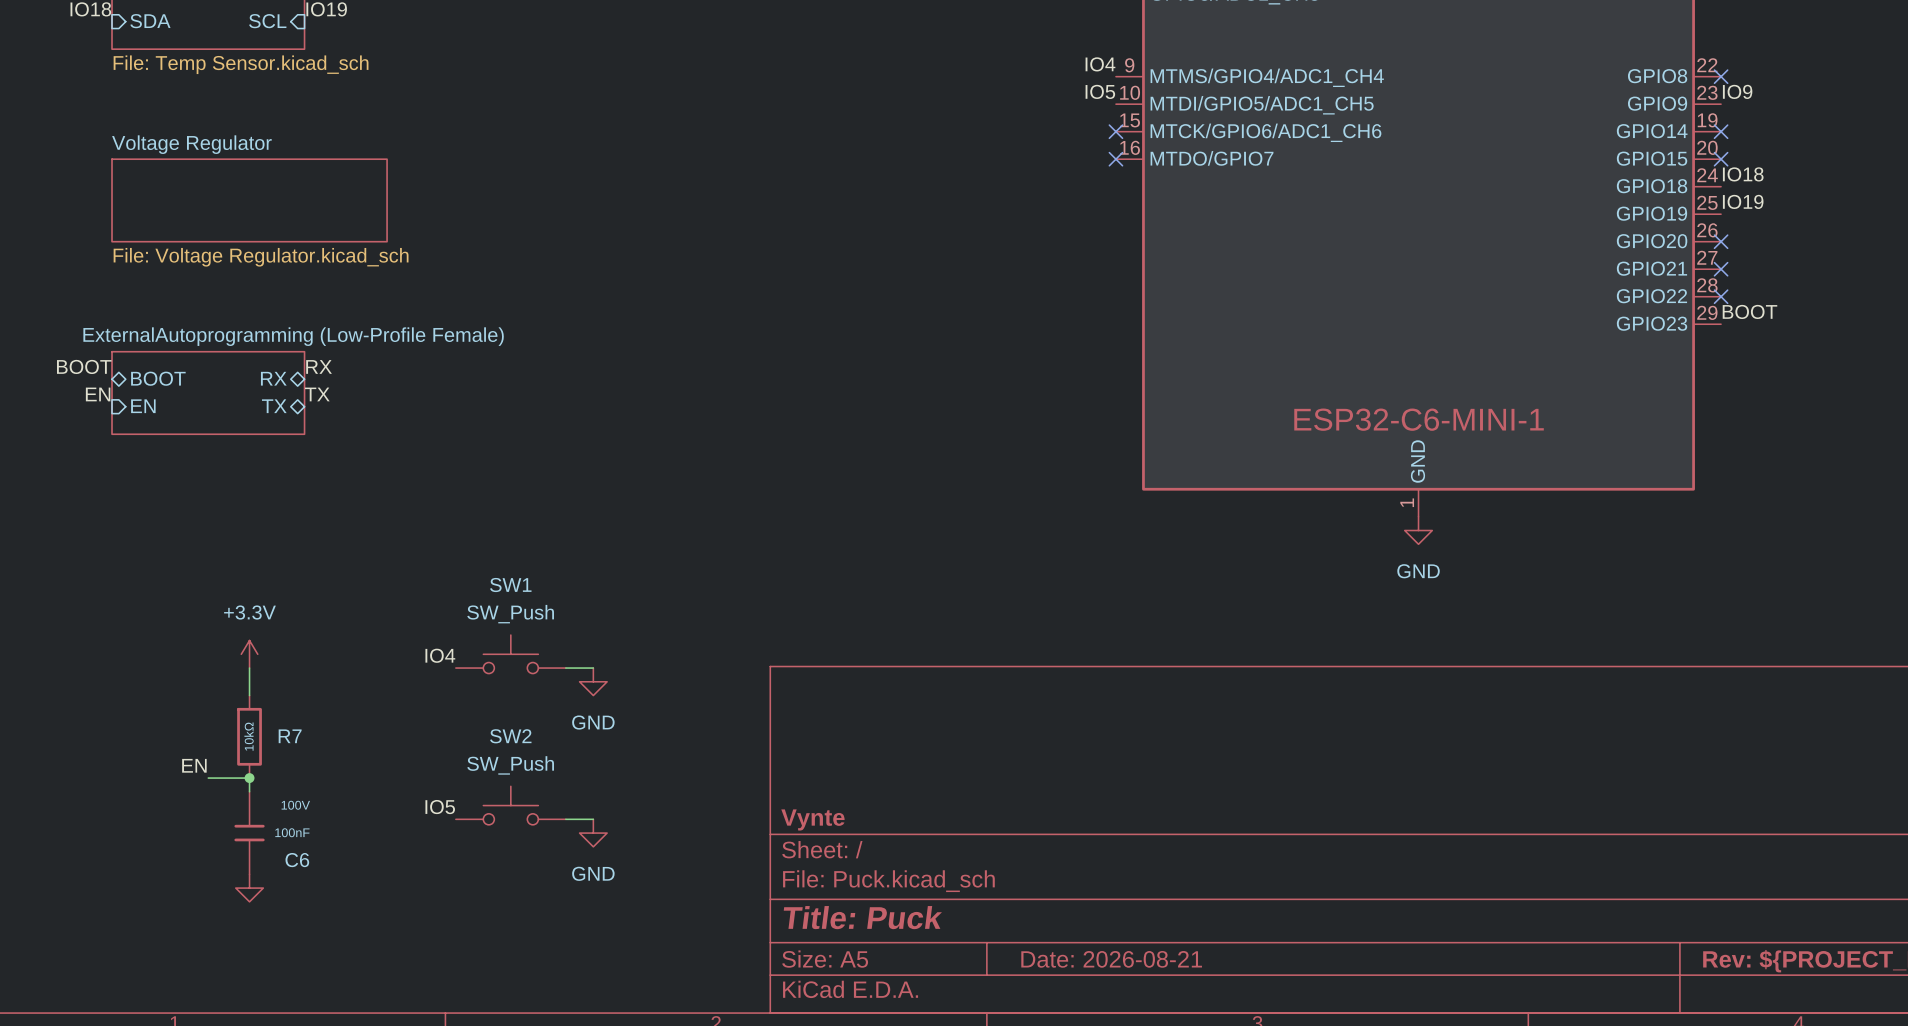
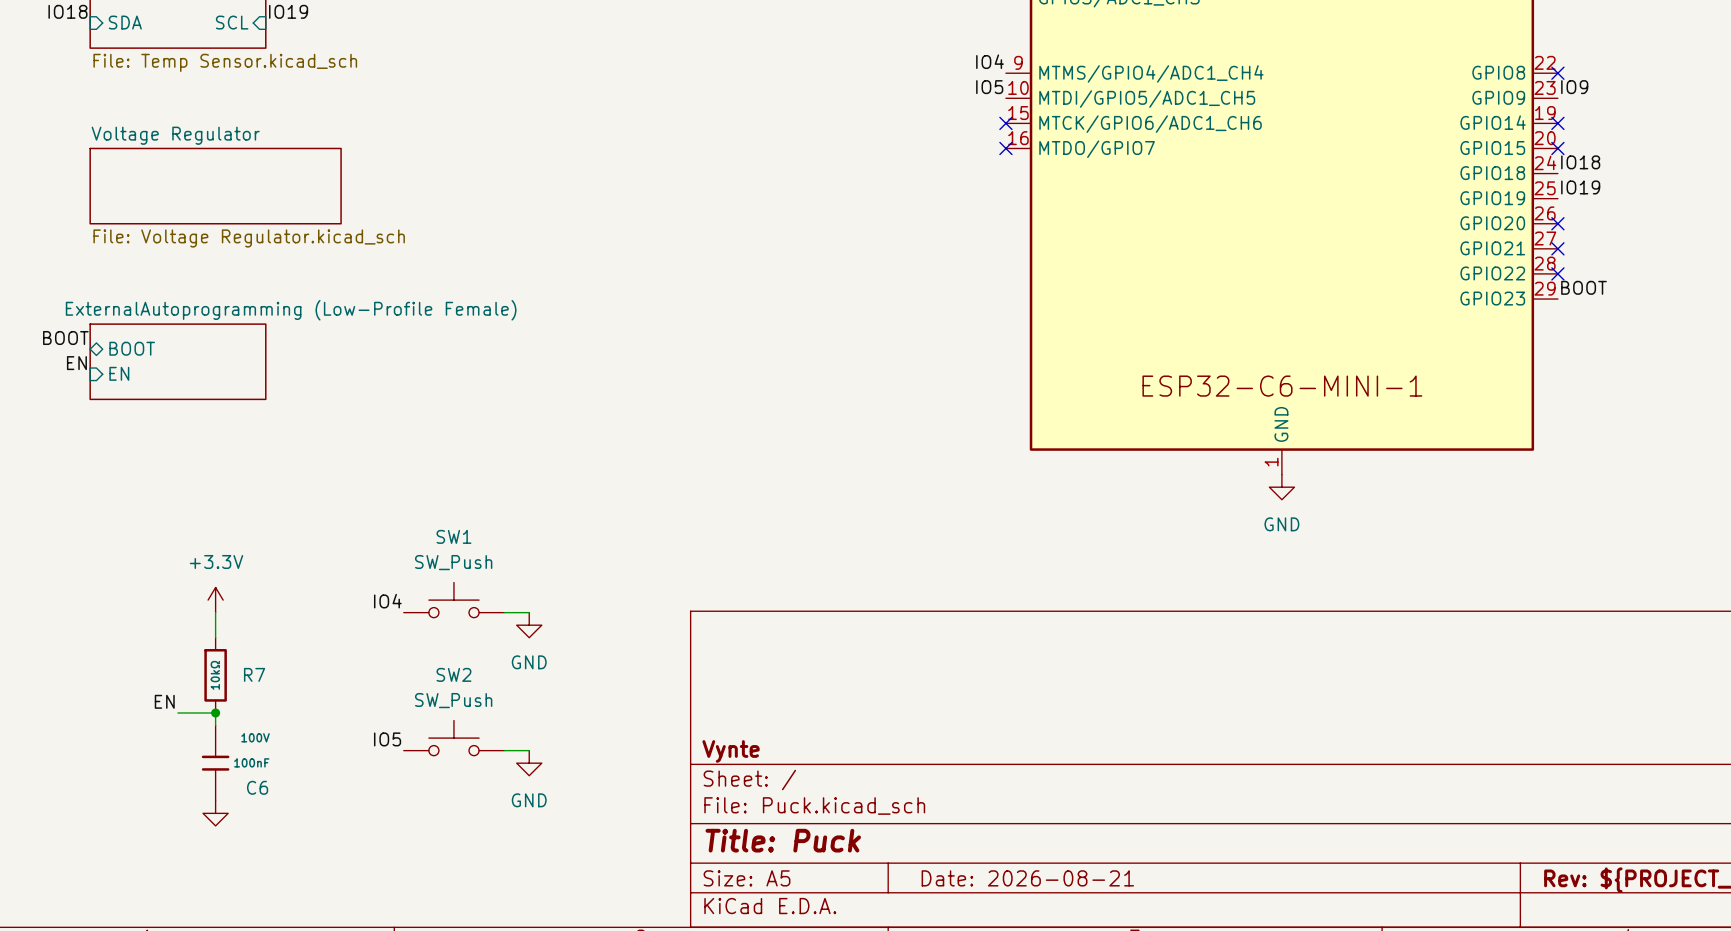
label: RX (319, 366) -> none
sheet pin: RX (273, 378) -> none
label: TX (317, 394) -> none
sheet pin: TX (274, 406) -> none

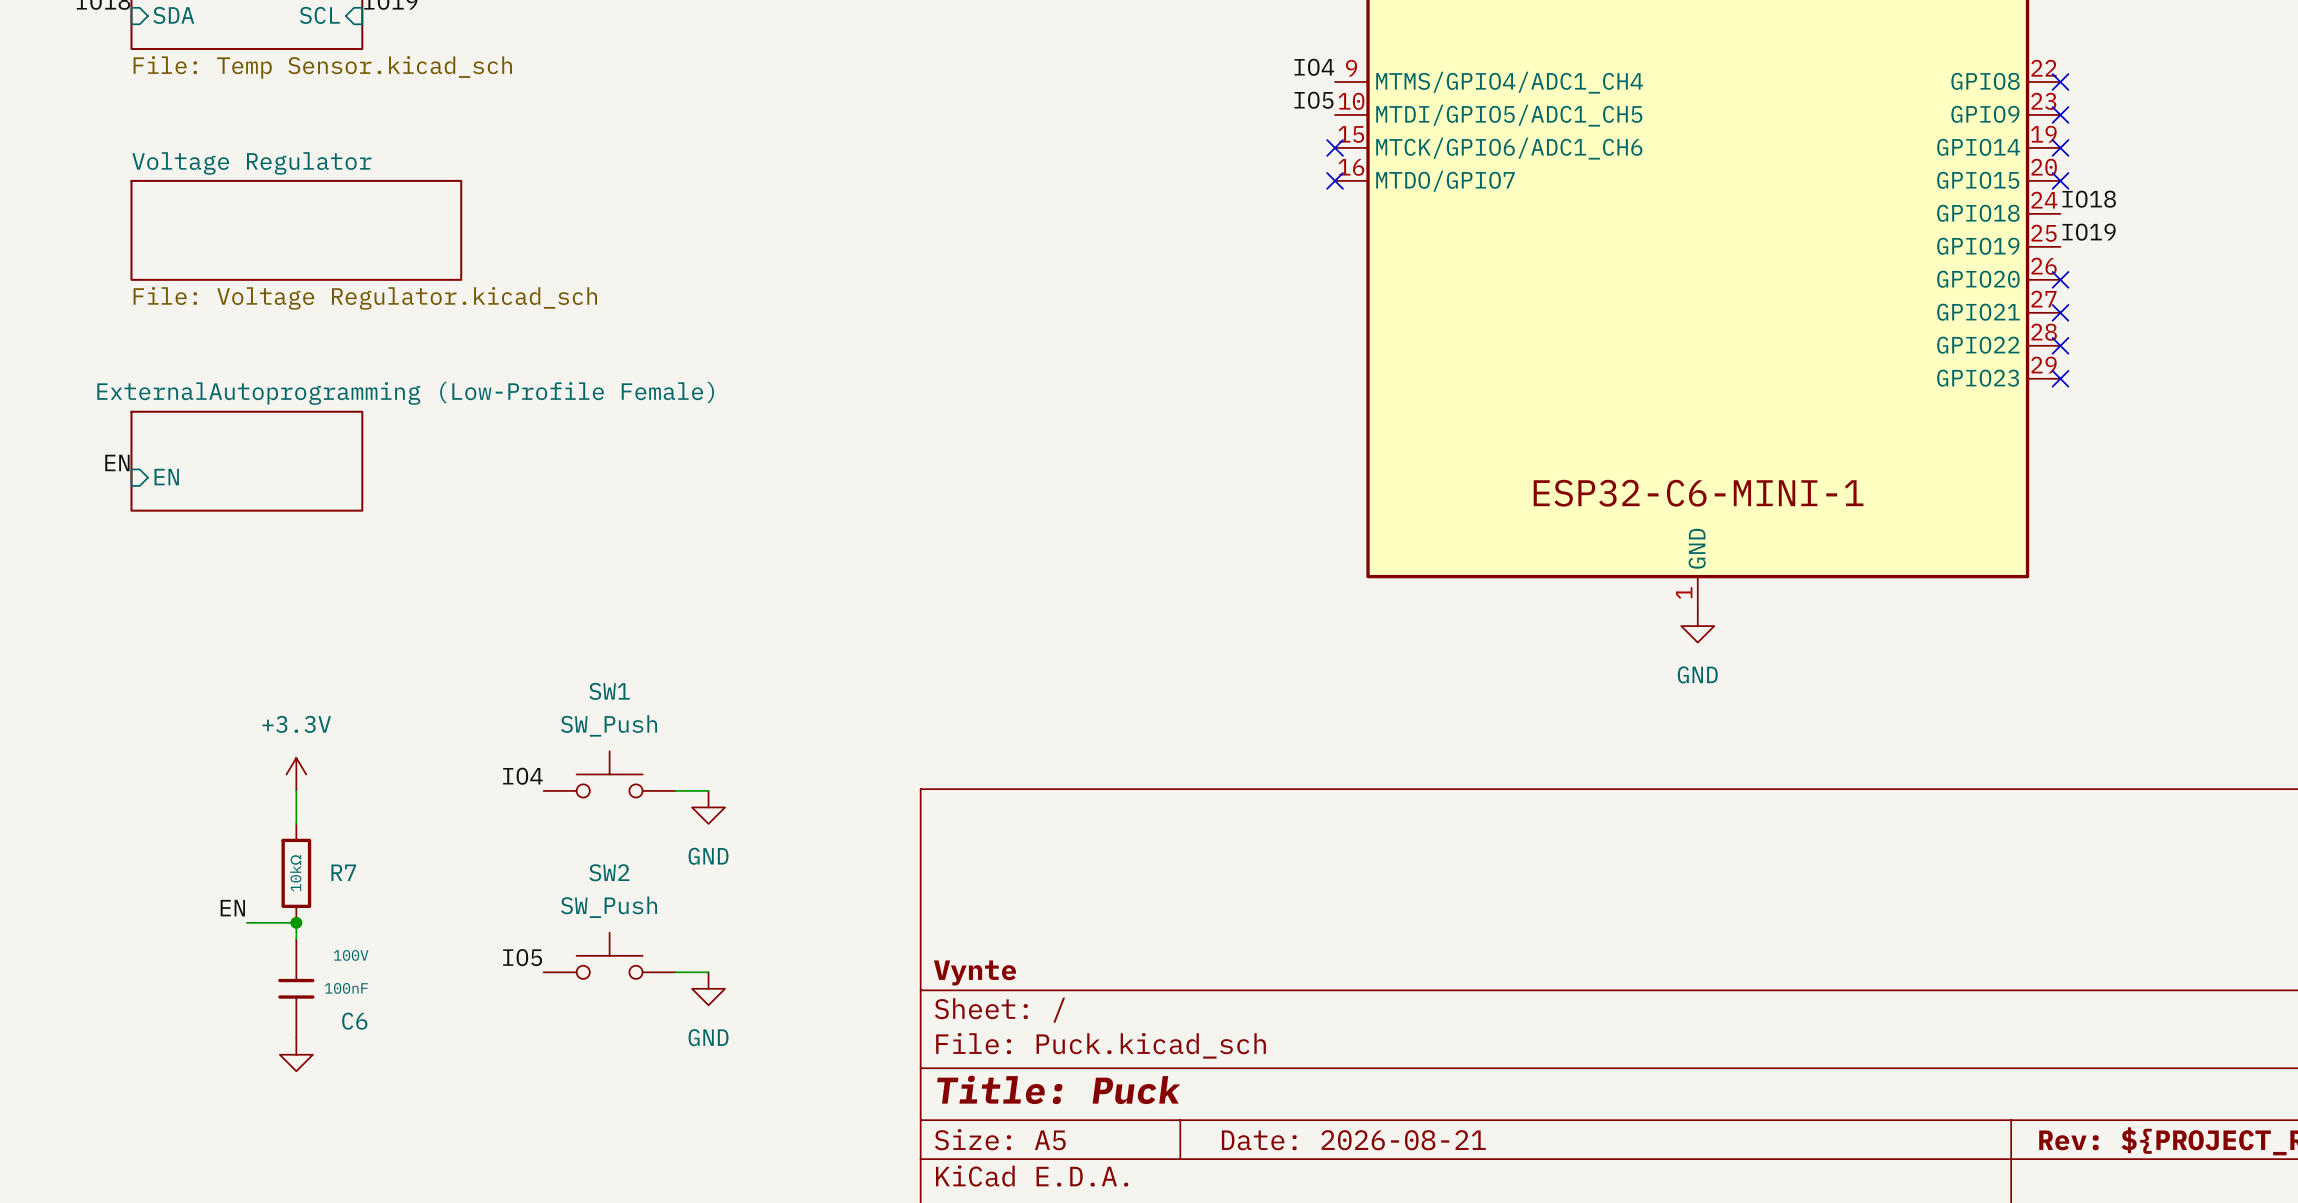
label: IO9 (1574, 87) -> none
no-connect mark: none -> (2060, 114)
label: BOOT (1583, 287) -> none
no-connect mark: none -> (2060, 378)
label: BOOT (65, 338) -> none
sheet pin: BOOT (132, 348) -> none

